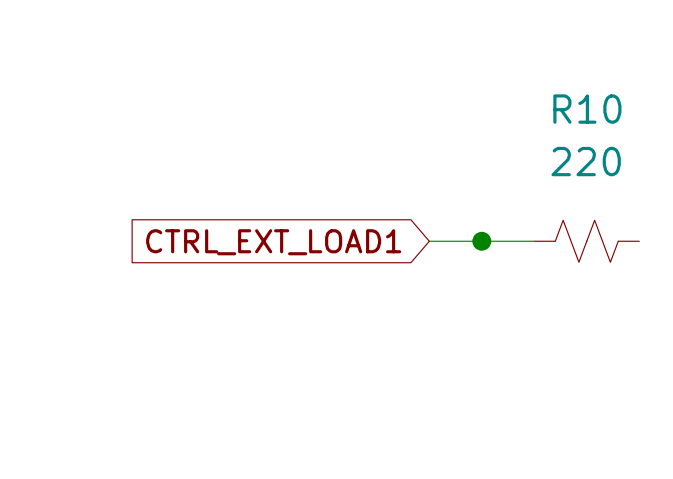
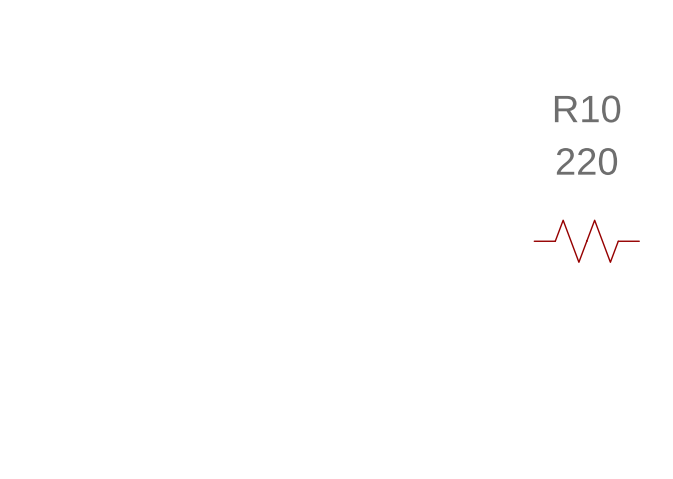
wire: (429, 241) (534, 241) -> none
junction: (481, 241) -> none
global label: CTRL_EXT_LOAD1 (273, 242) -> none

